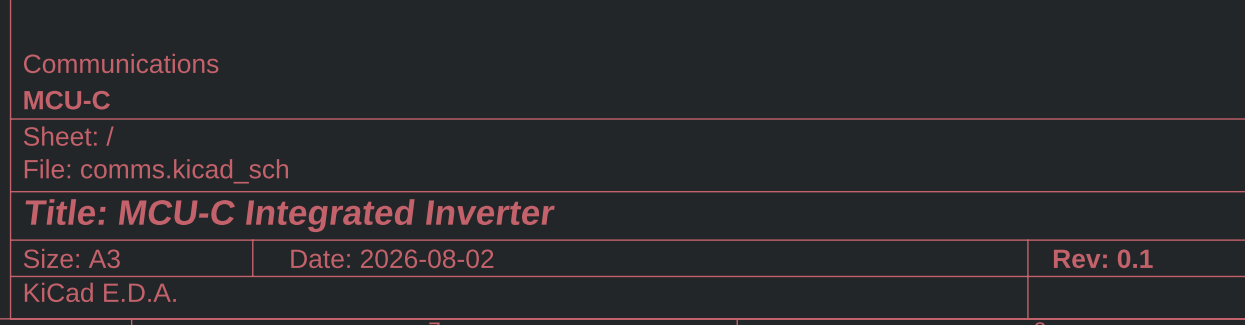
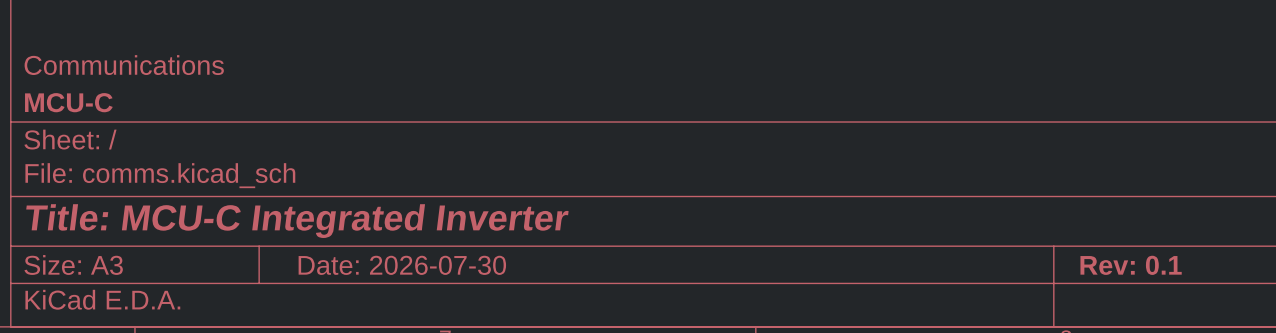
title block: Date: 2026-08-02 (392, 258) -> Date: 2026-07-30 (402, 265)

